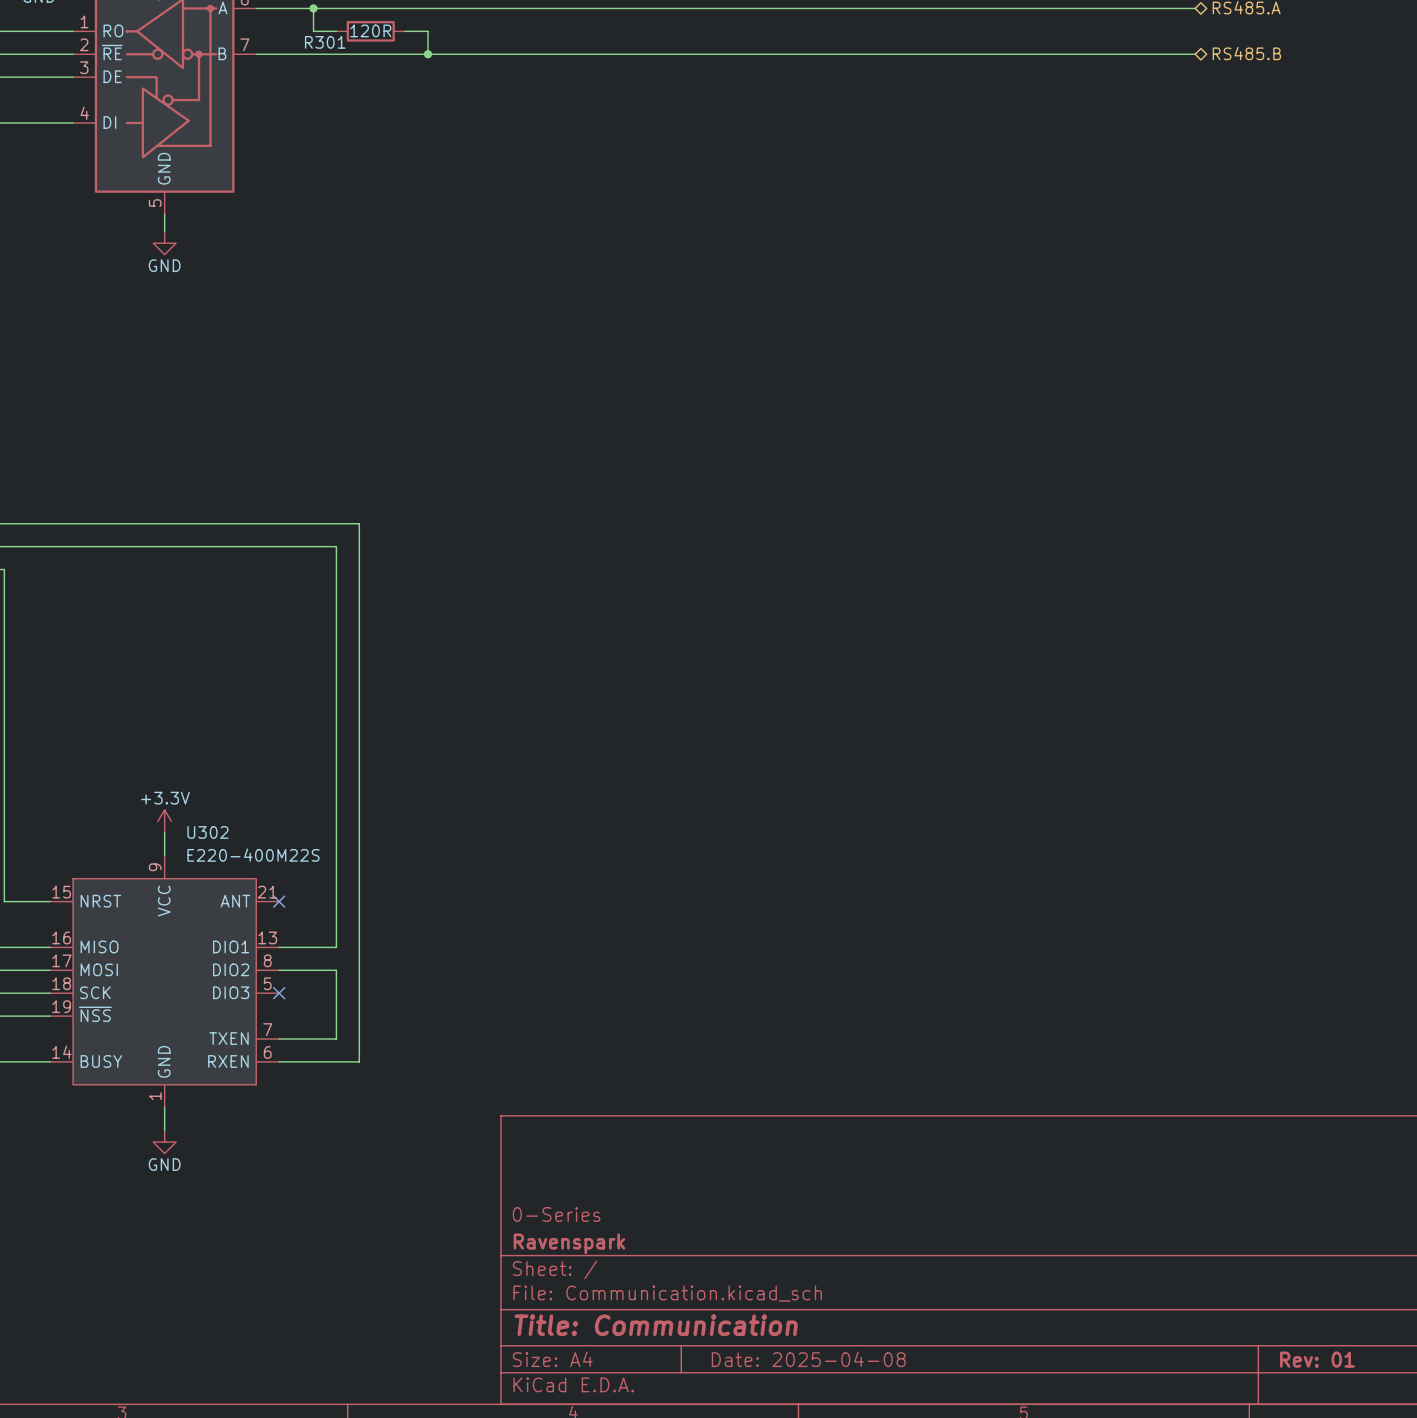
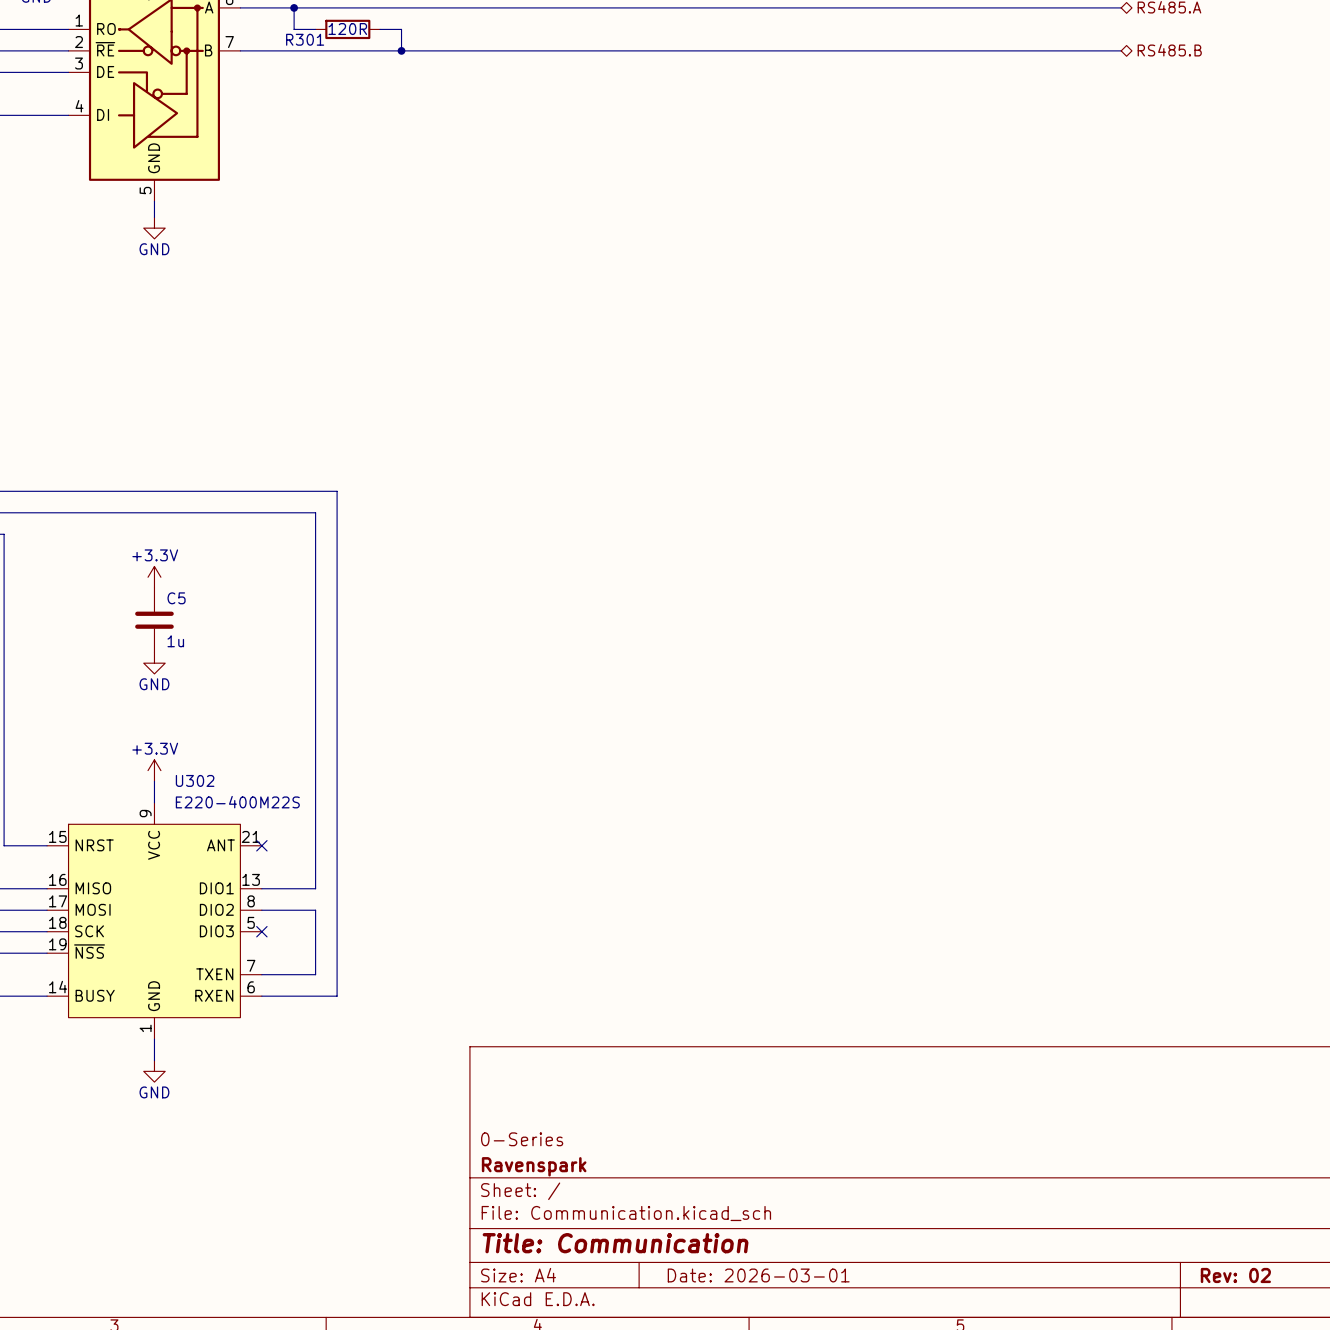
power symbol: none -> +3.3V (154, 577)
C5: none -> 1u (154, 620)
power symbol: none -> GND (154, 663)
title block: Date: 2025-04-08 (808, 1359) -> Date: 2026-03-01 (758, 1275)
title block: Rev: 01 (1317, 1359) -> Rev: 02 (1235, 1275)

